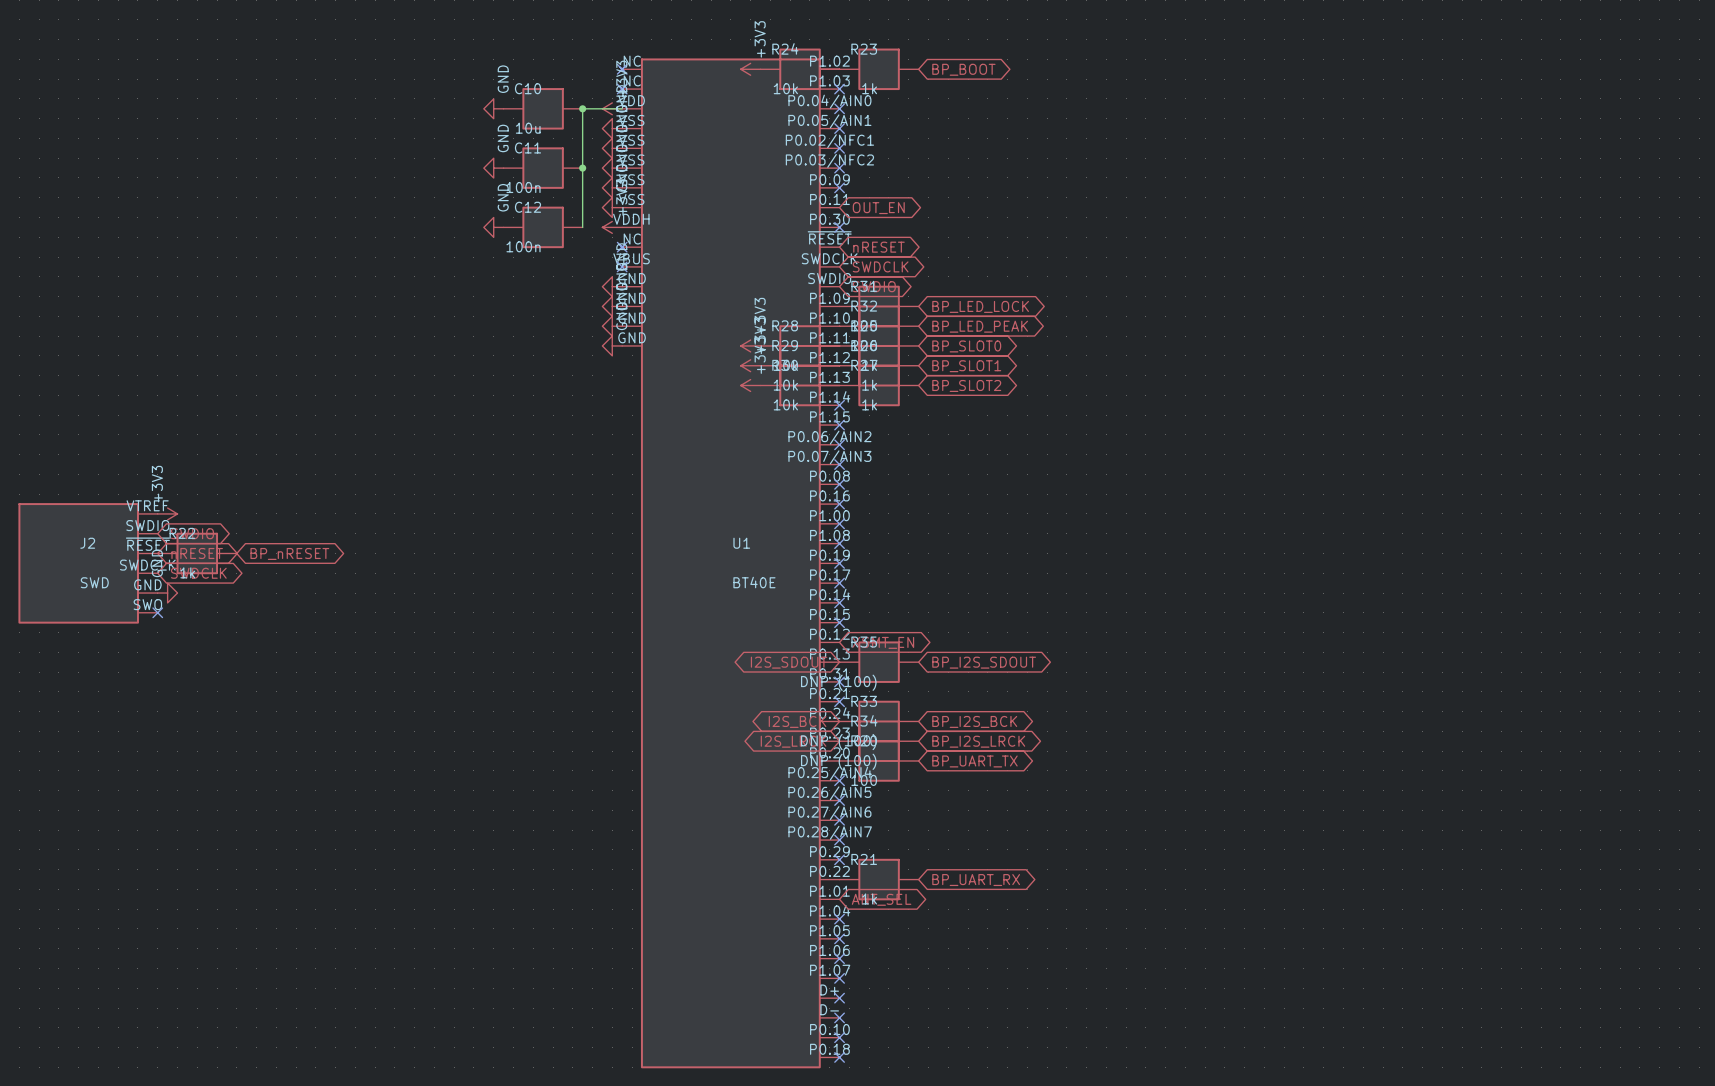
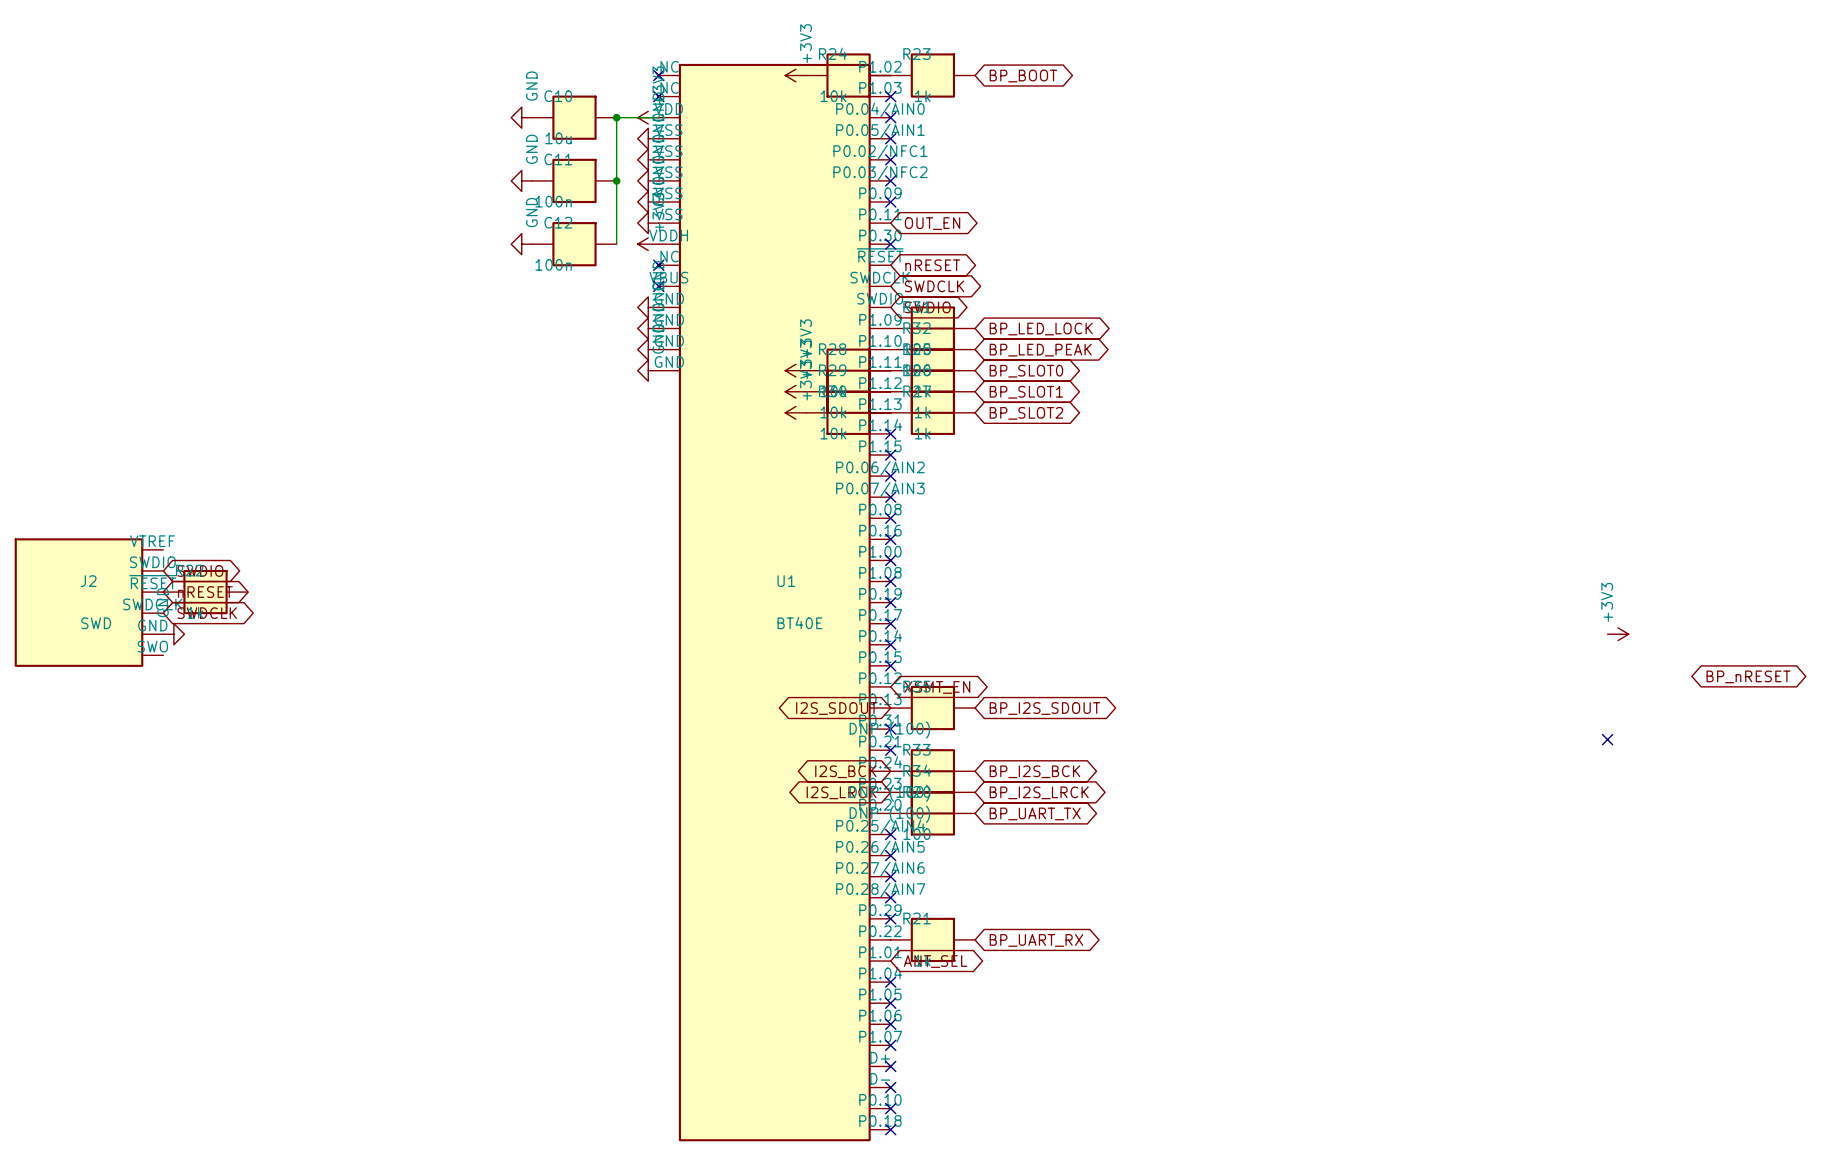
power symbol: +3V3 (167, 513) -> none
global label: BP_nRESET (289, 553) -> none
power symbol: none -> +3V3 (1618, 634)
no-connect mark: (157, 612) -> none
global label: none -> BP_nRESET (1748, 676)
no-connect mark: none -> (1607, 739)

